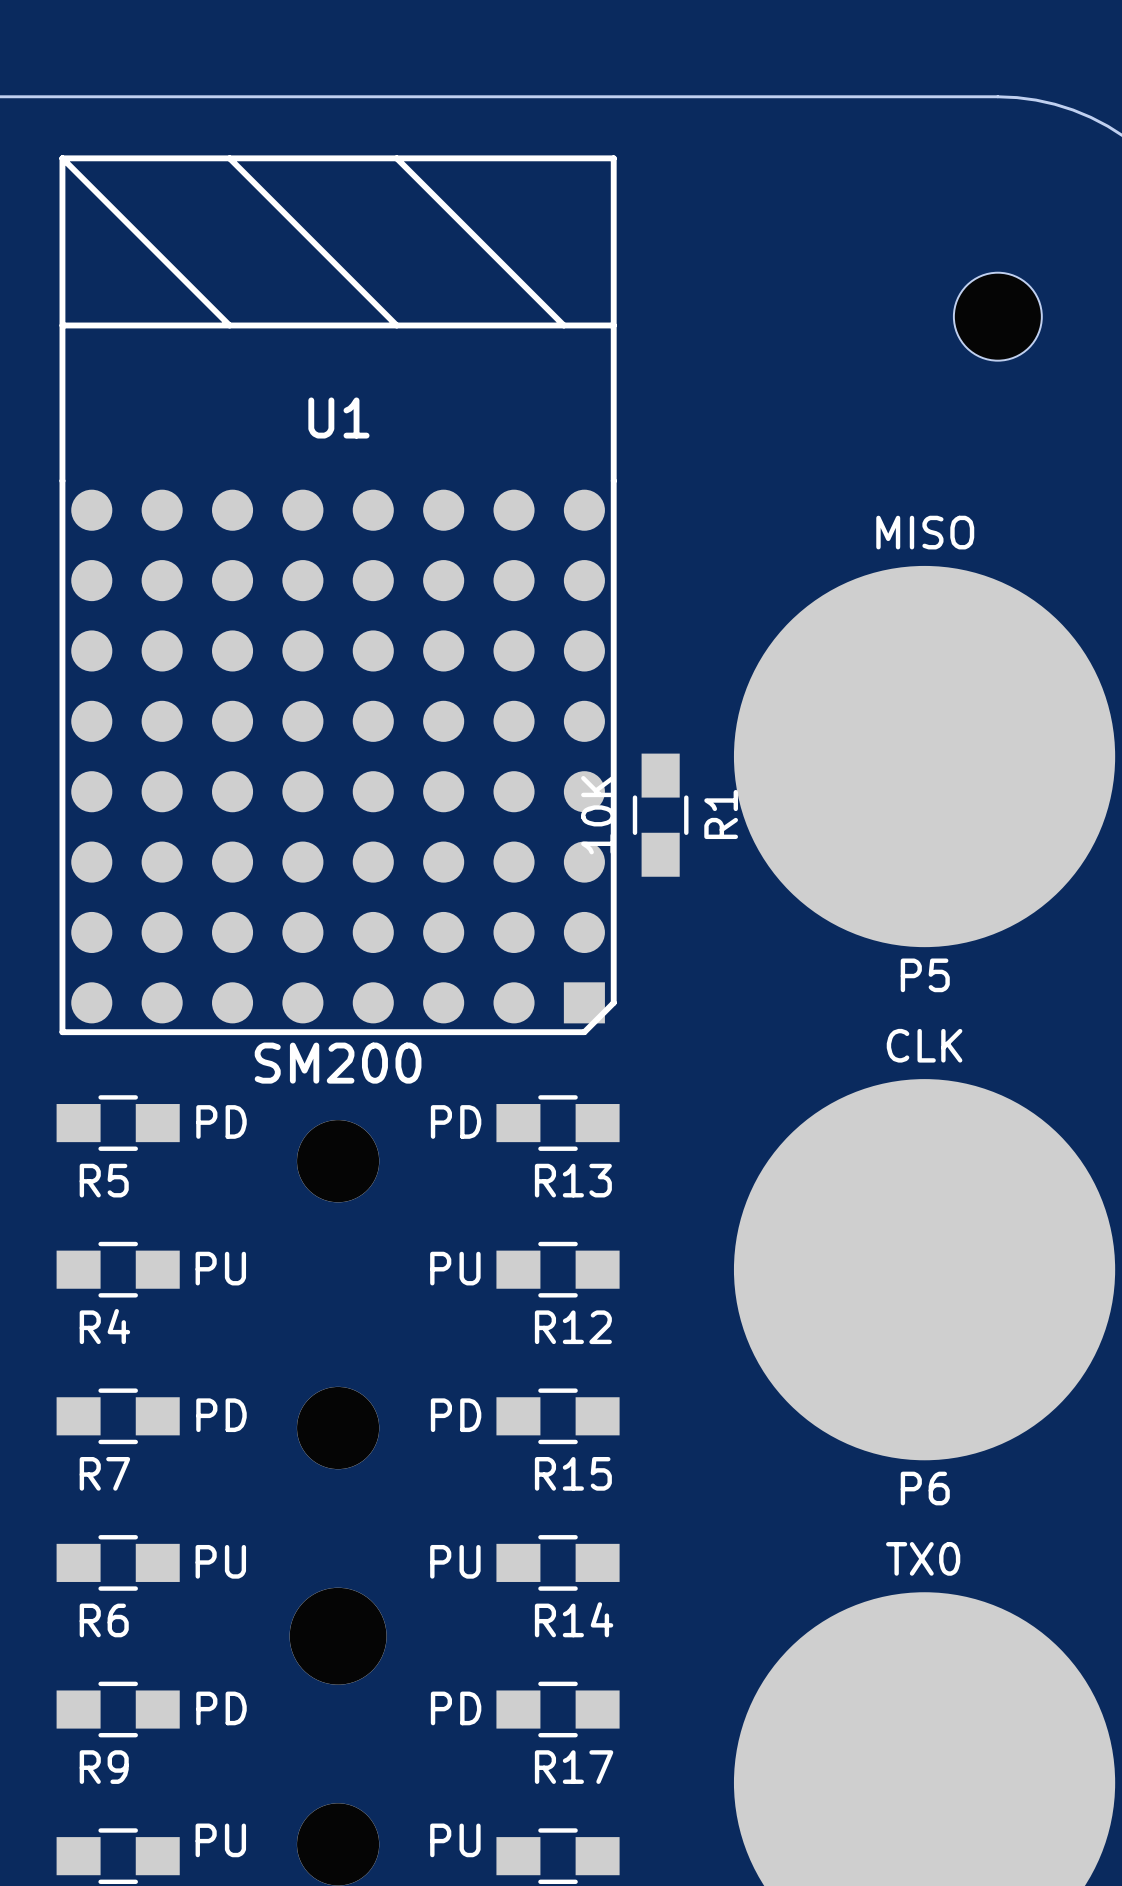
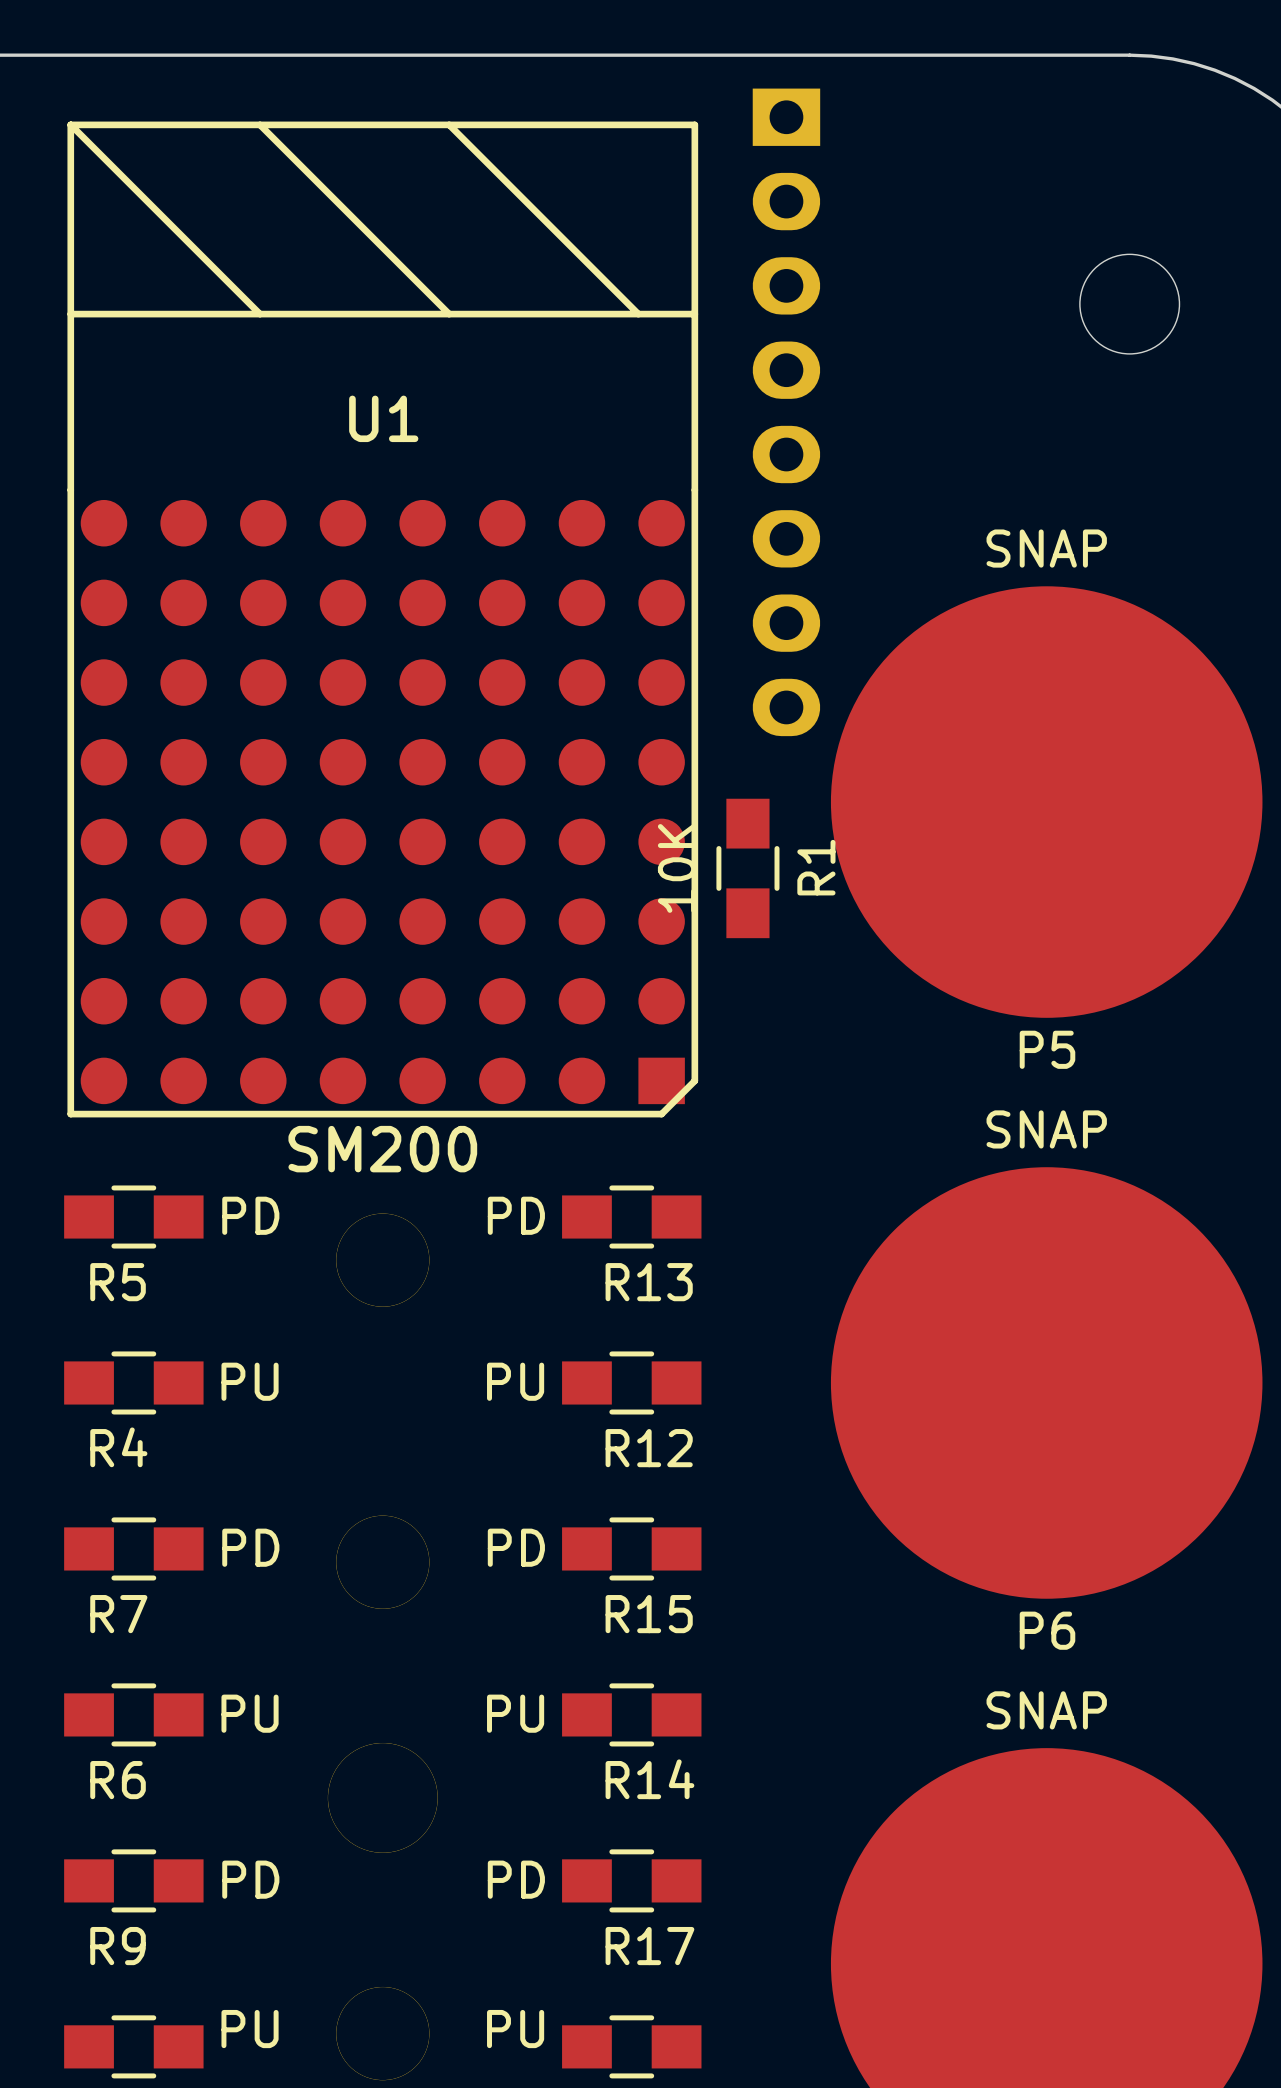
part: none -> (786, 412)
P5 value: MISO (925, 532) -> SNAP (1046, 548)
P6 value: CLK (924, 1045) -> SNAP (1046, 1129)
part value: TX0 (923, 1558) -> SNAP (1046, 1710)

